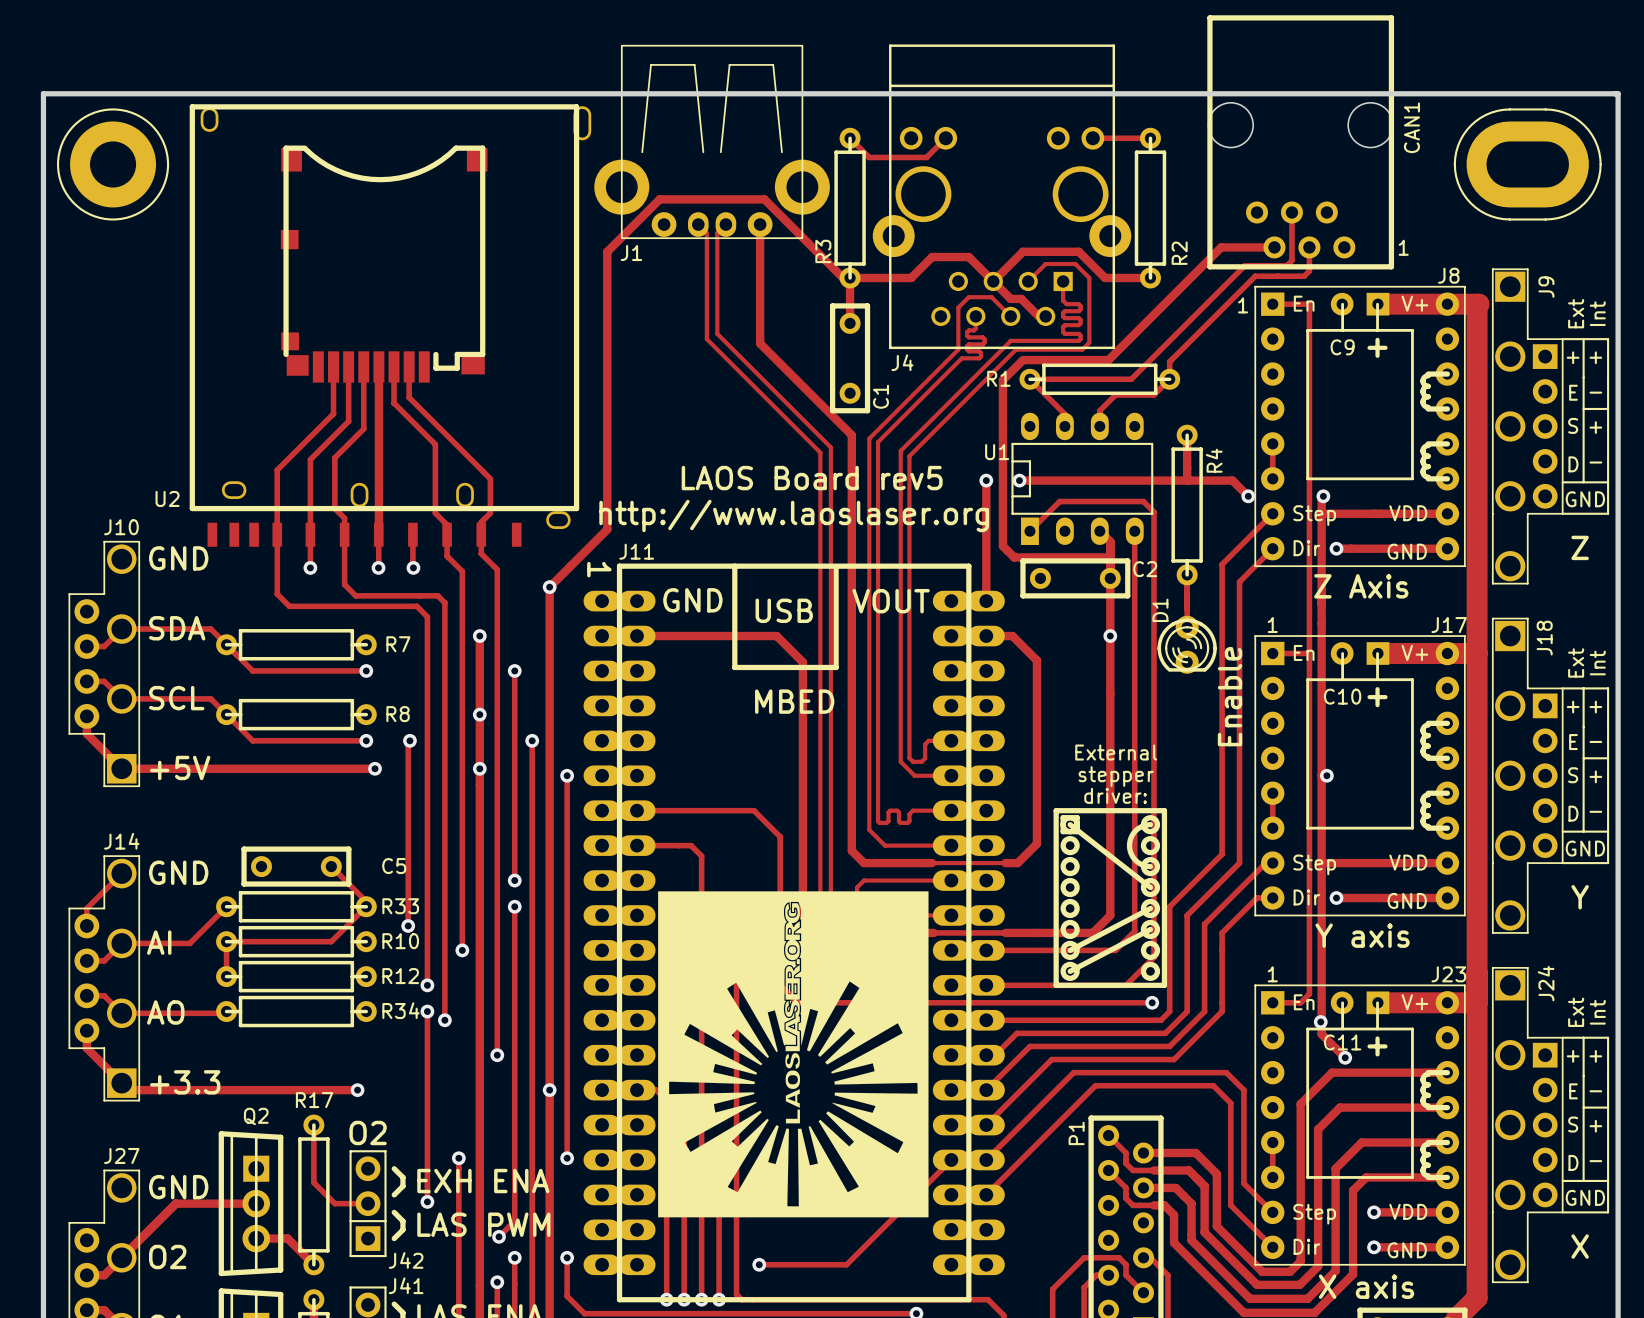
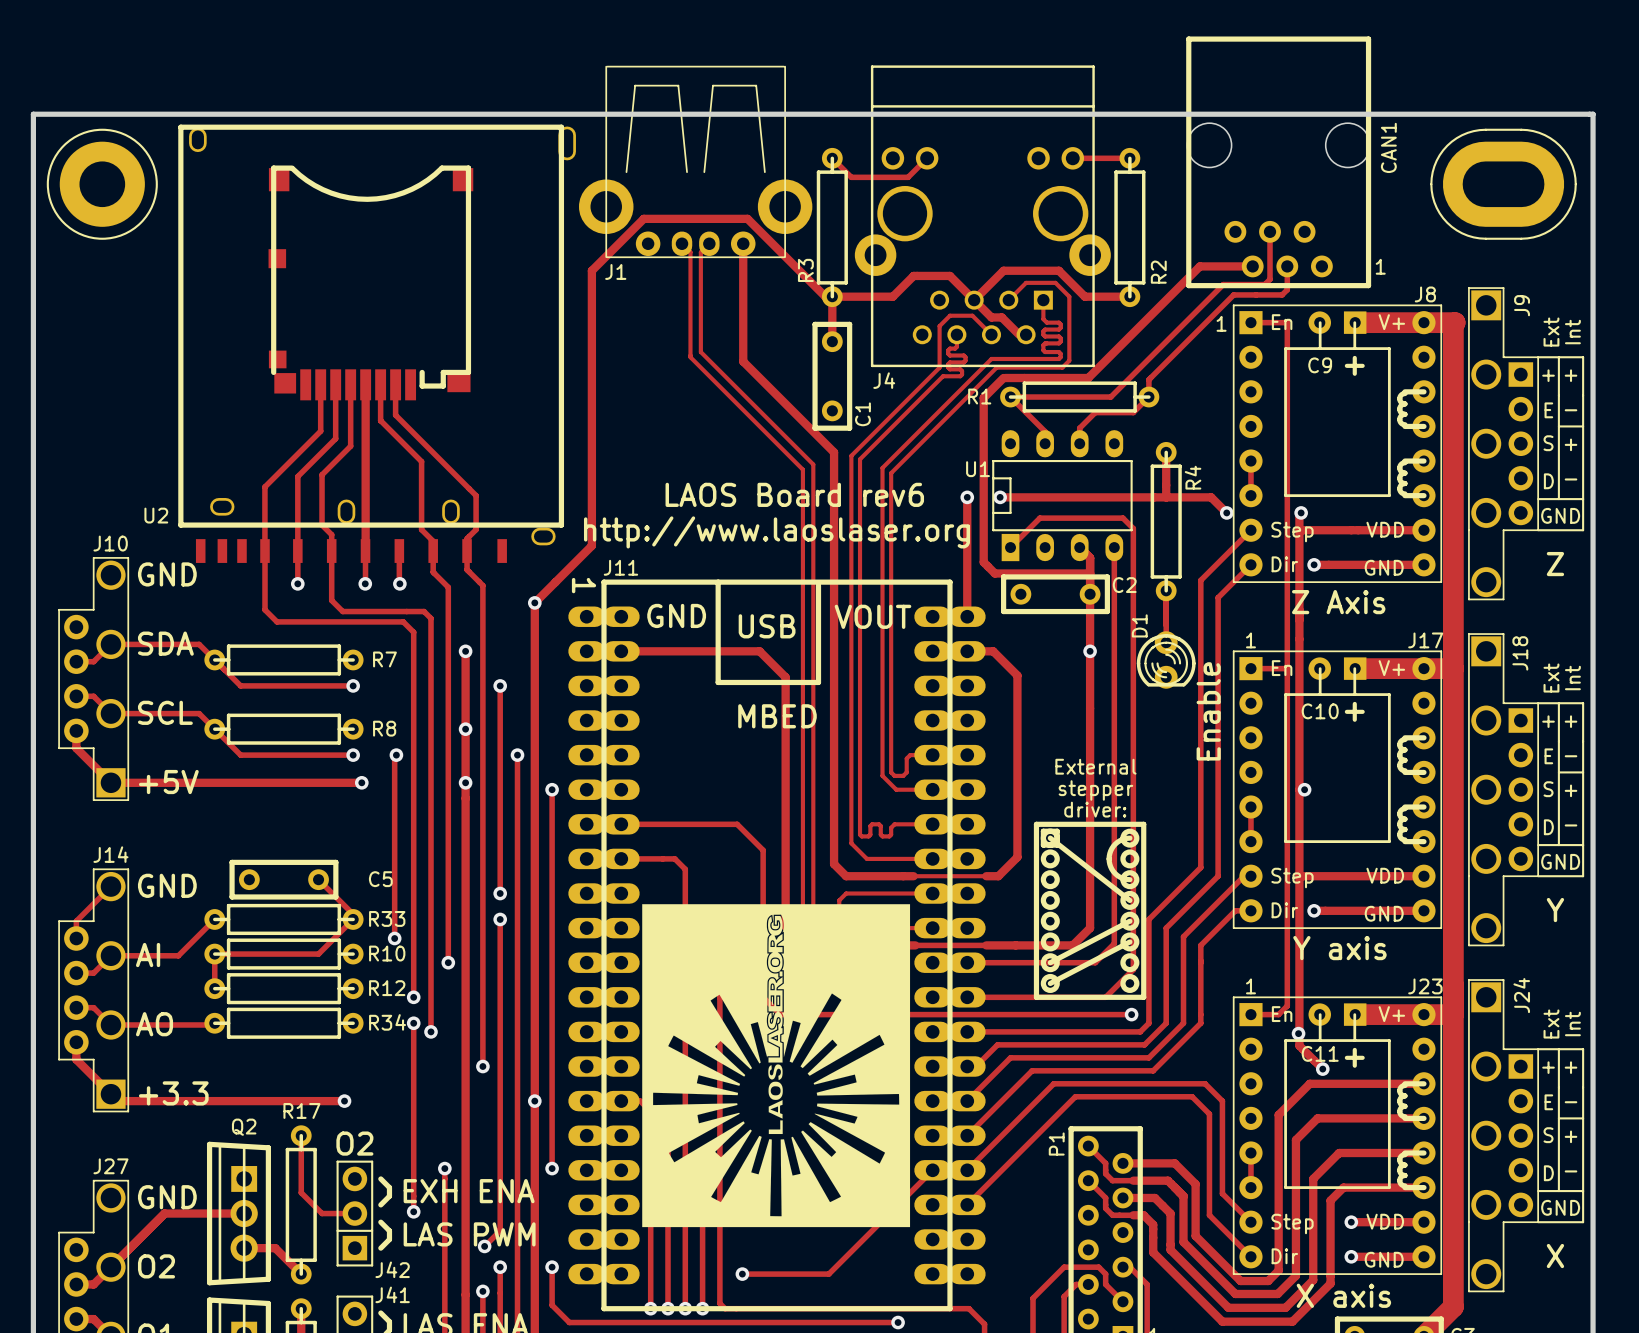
text: LAOS Board rev5 (812, 478) -> LAOS Board rev6 (794, 494)

